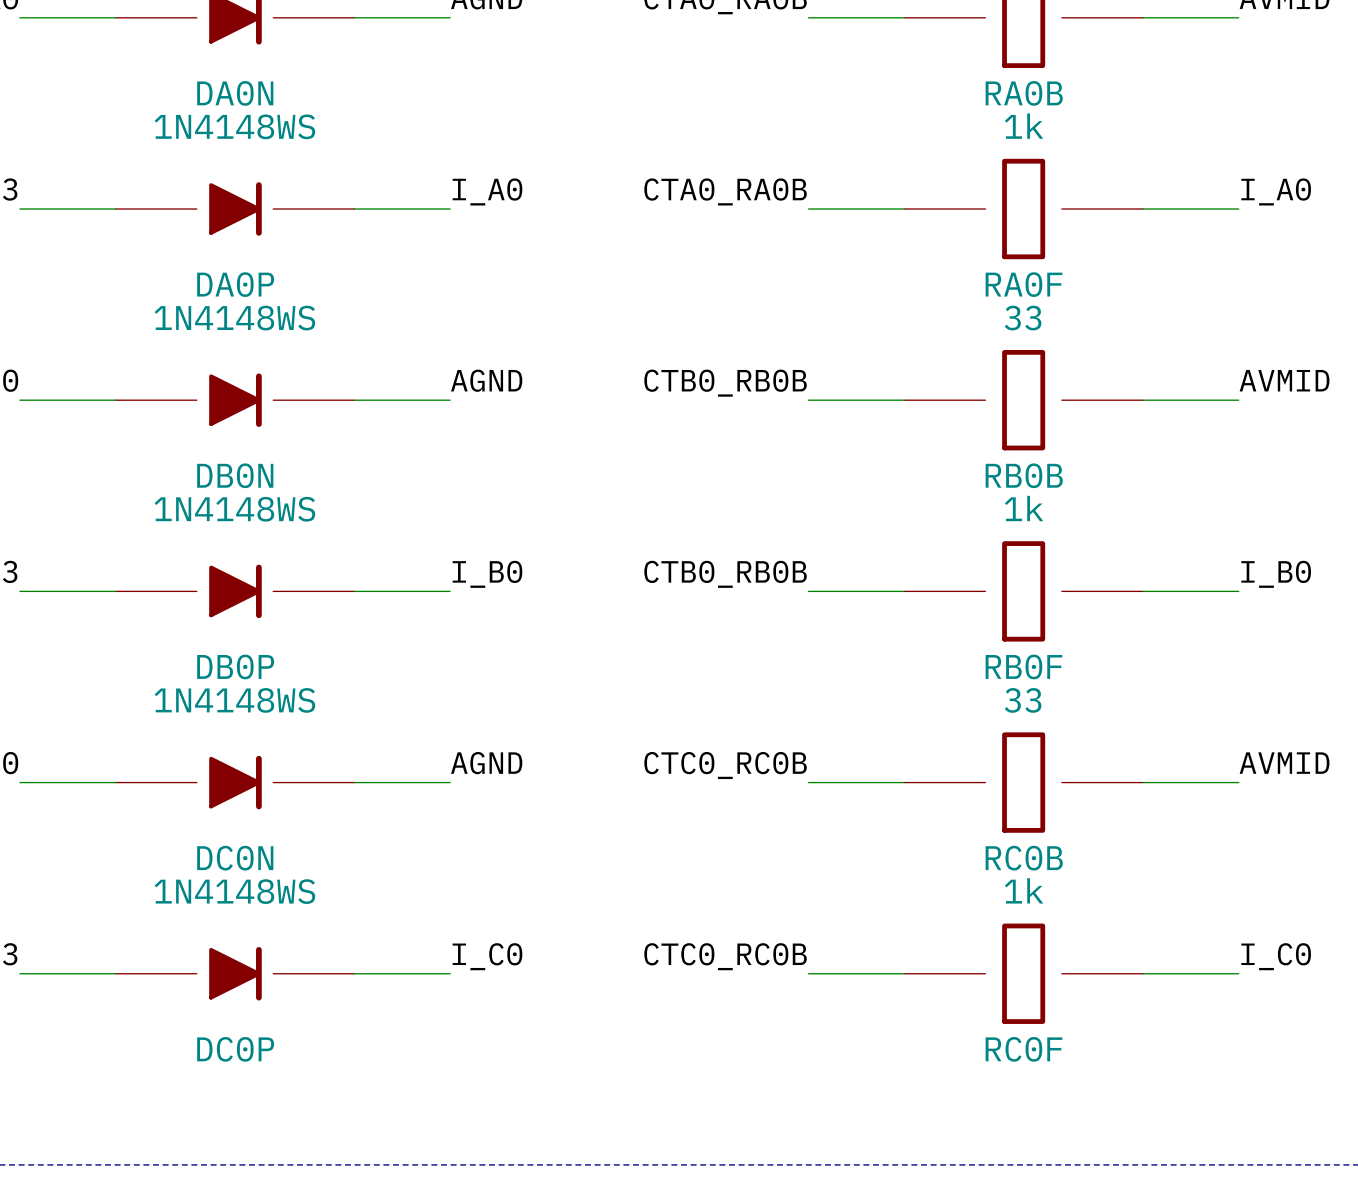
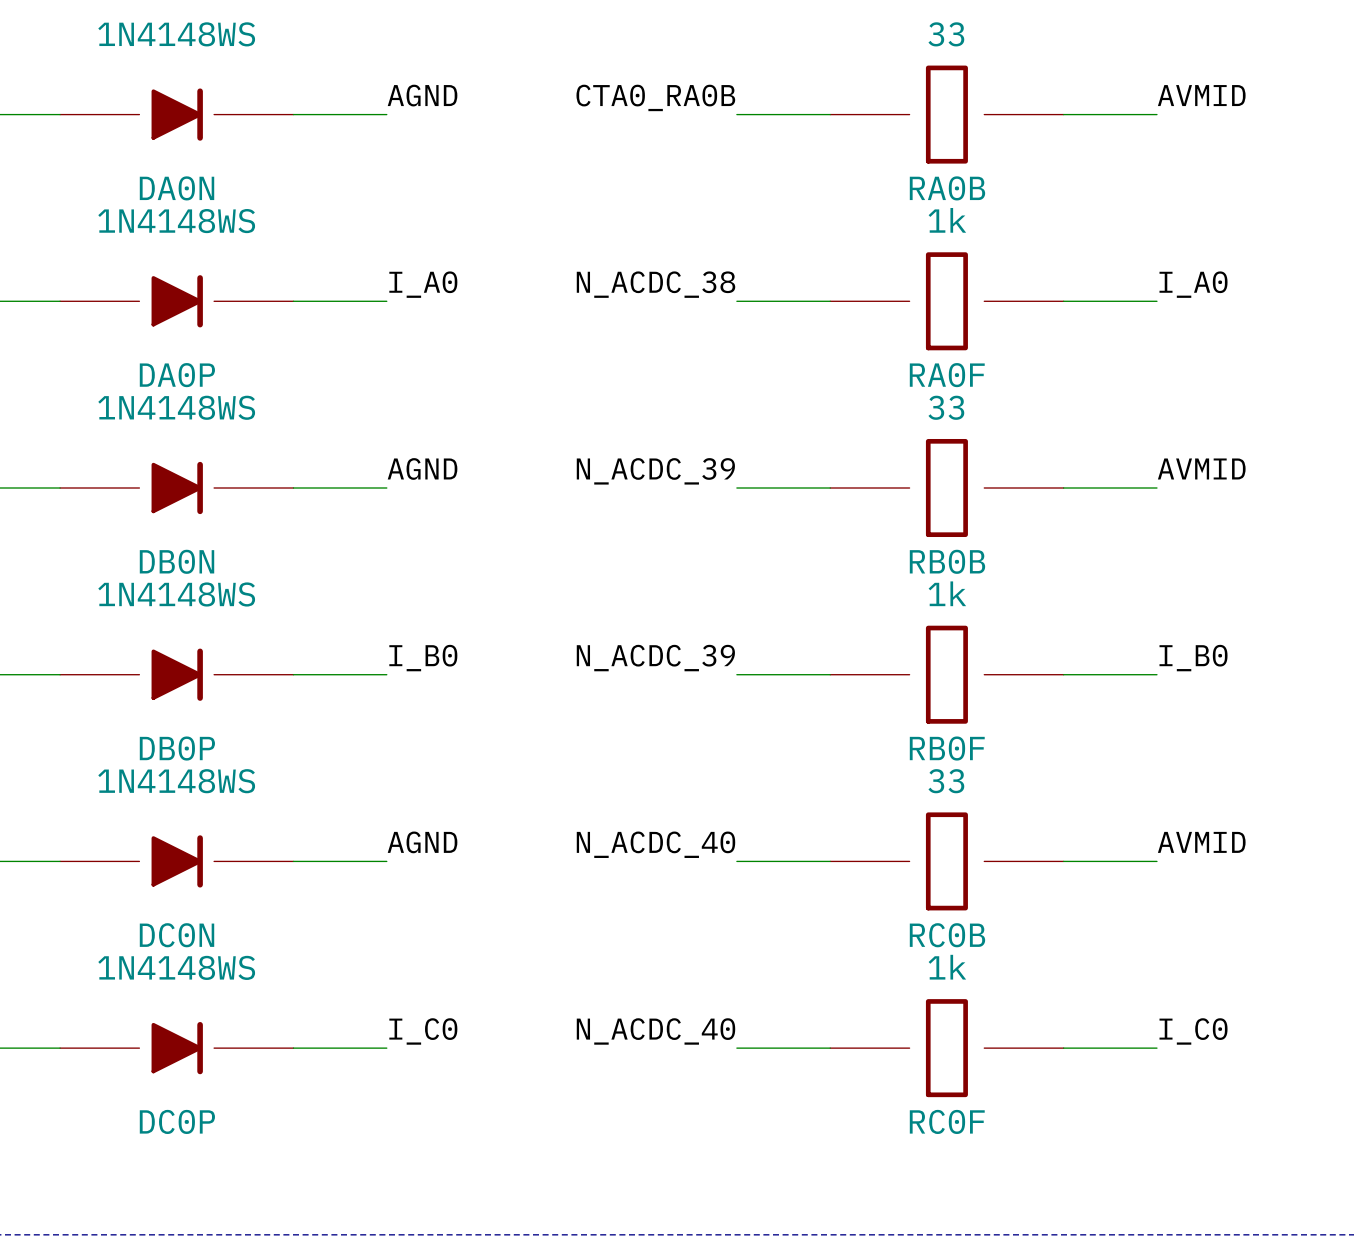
label: CTA0_RA0B (725, 191) -> N_ACDC_38 (656, 284)
label: CTB0_RB0B (725, 383) -> N_ACDC_39 (655, 471)
label: CTB0_RB0B (725, 574) -> N_ACDC_39 (655, 658)
label: CTC0_RC0B (725, 765) -> N_ACDC_40 (655, 844)
label: CTC0_RC0B (725, 956) -> N_ACDC_40 (655, 1031)

